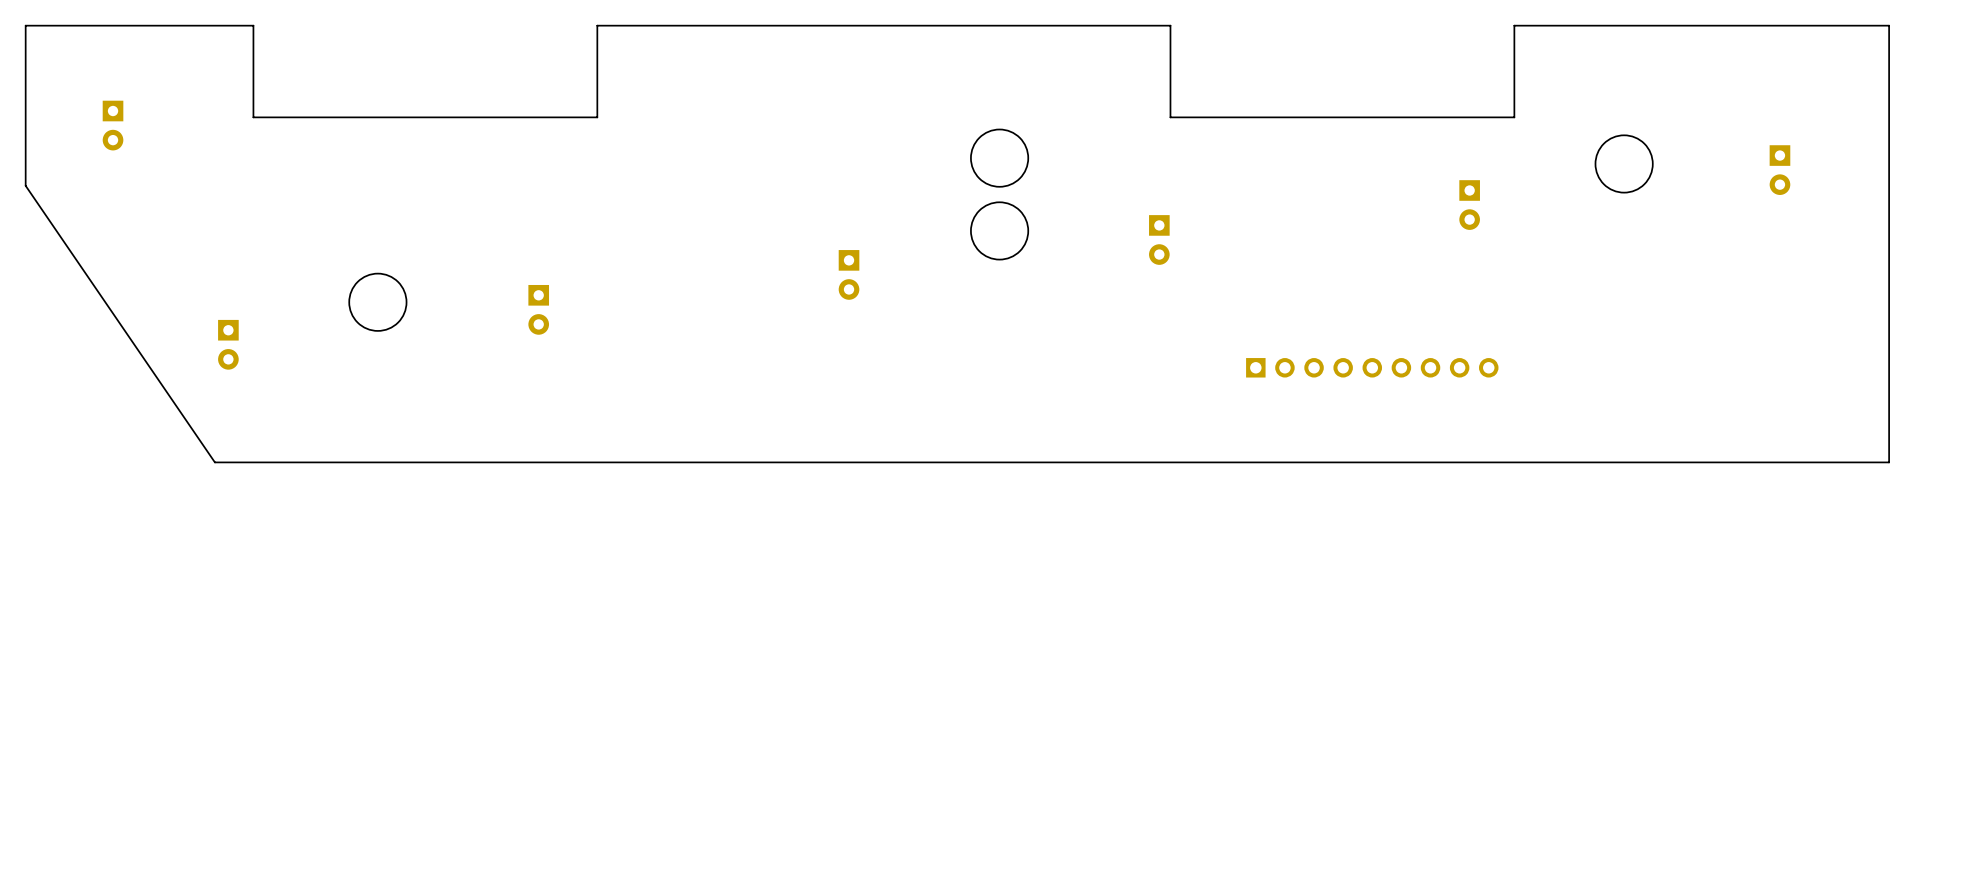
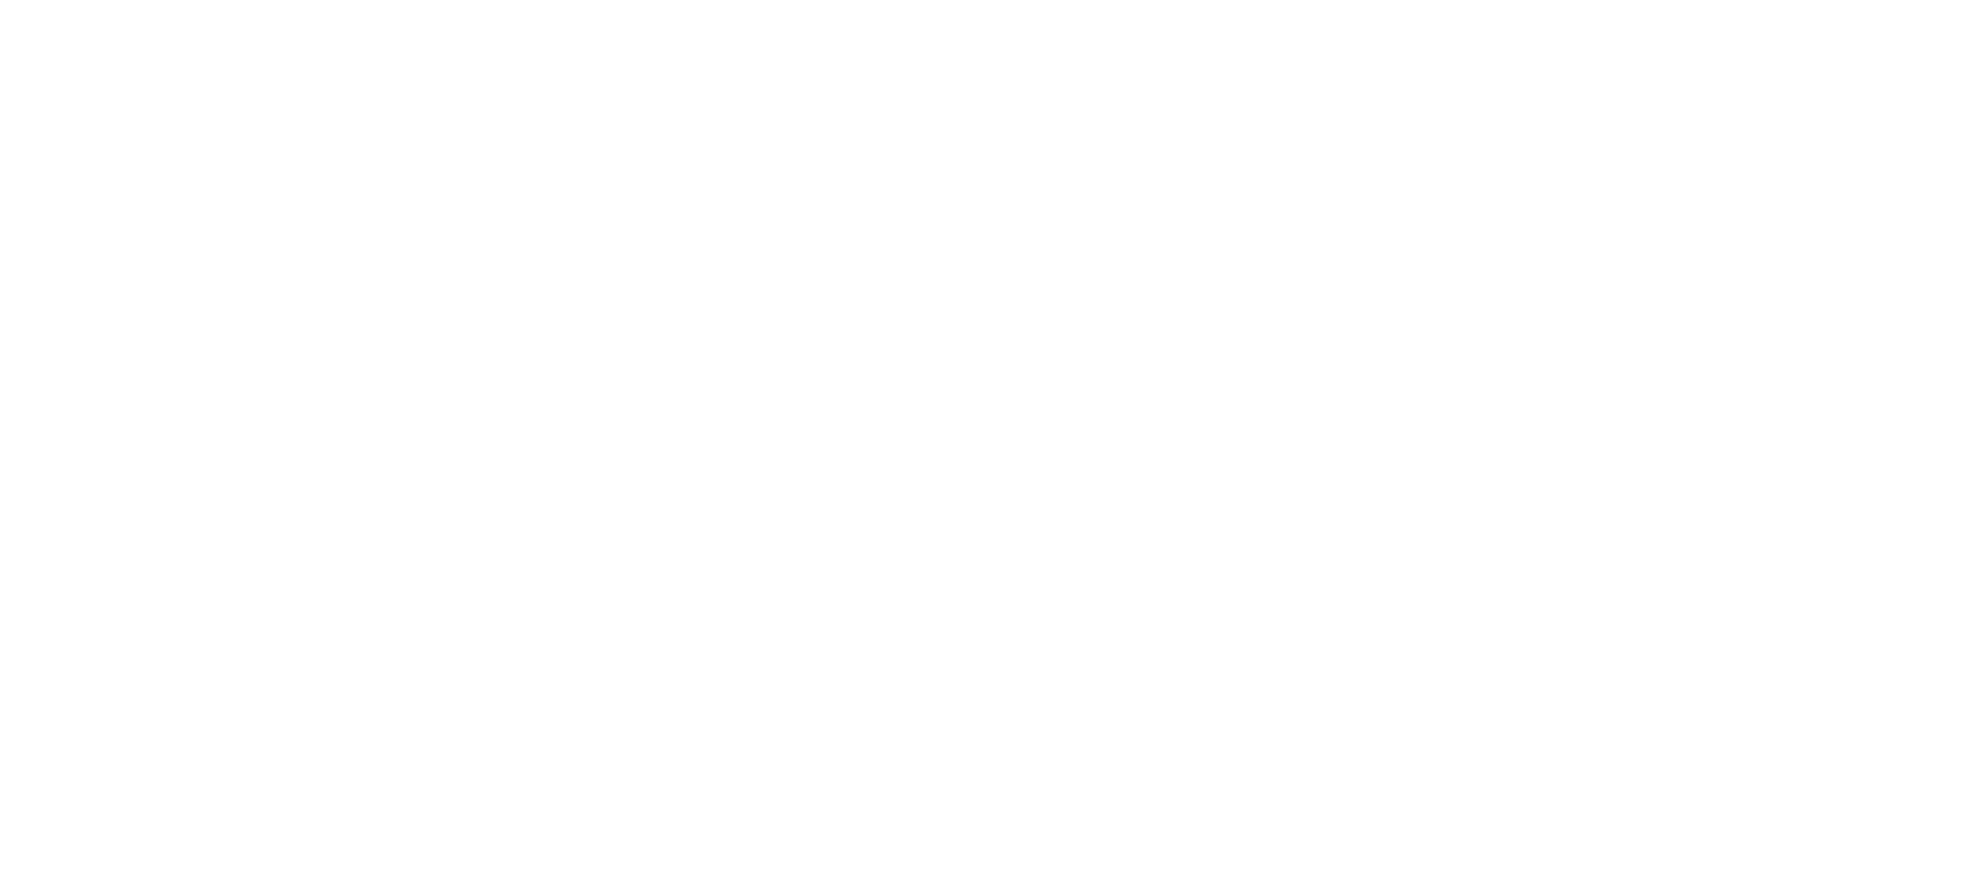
board edge: (1889, 25) (1514, 25) (1514, 117) (1170, 117) (1170, 25) (597, 25) (597, 117) (253, 117) (253, 25) (25, 25) (25, 185) (214, 462) (1889, 462) (1889, 25) -> none
part: (113, 125) -> none
round board edge: [970, 128, 1030, 188] -> none
round board edge: [1594, 134, 1654, 194] -> none
part: (1779, 170) -> none
round board edge: [970, 201, 1030, 261] -> none
part: (1469, 205) -> none
part: (1159, 239) -> none
round board edge: [348, 272, 408, 332] -> none
part: (849, 274) -> none
part: (538, 309) -> none
part: (228, 344) -> none
part: (1372, 367) -> none

